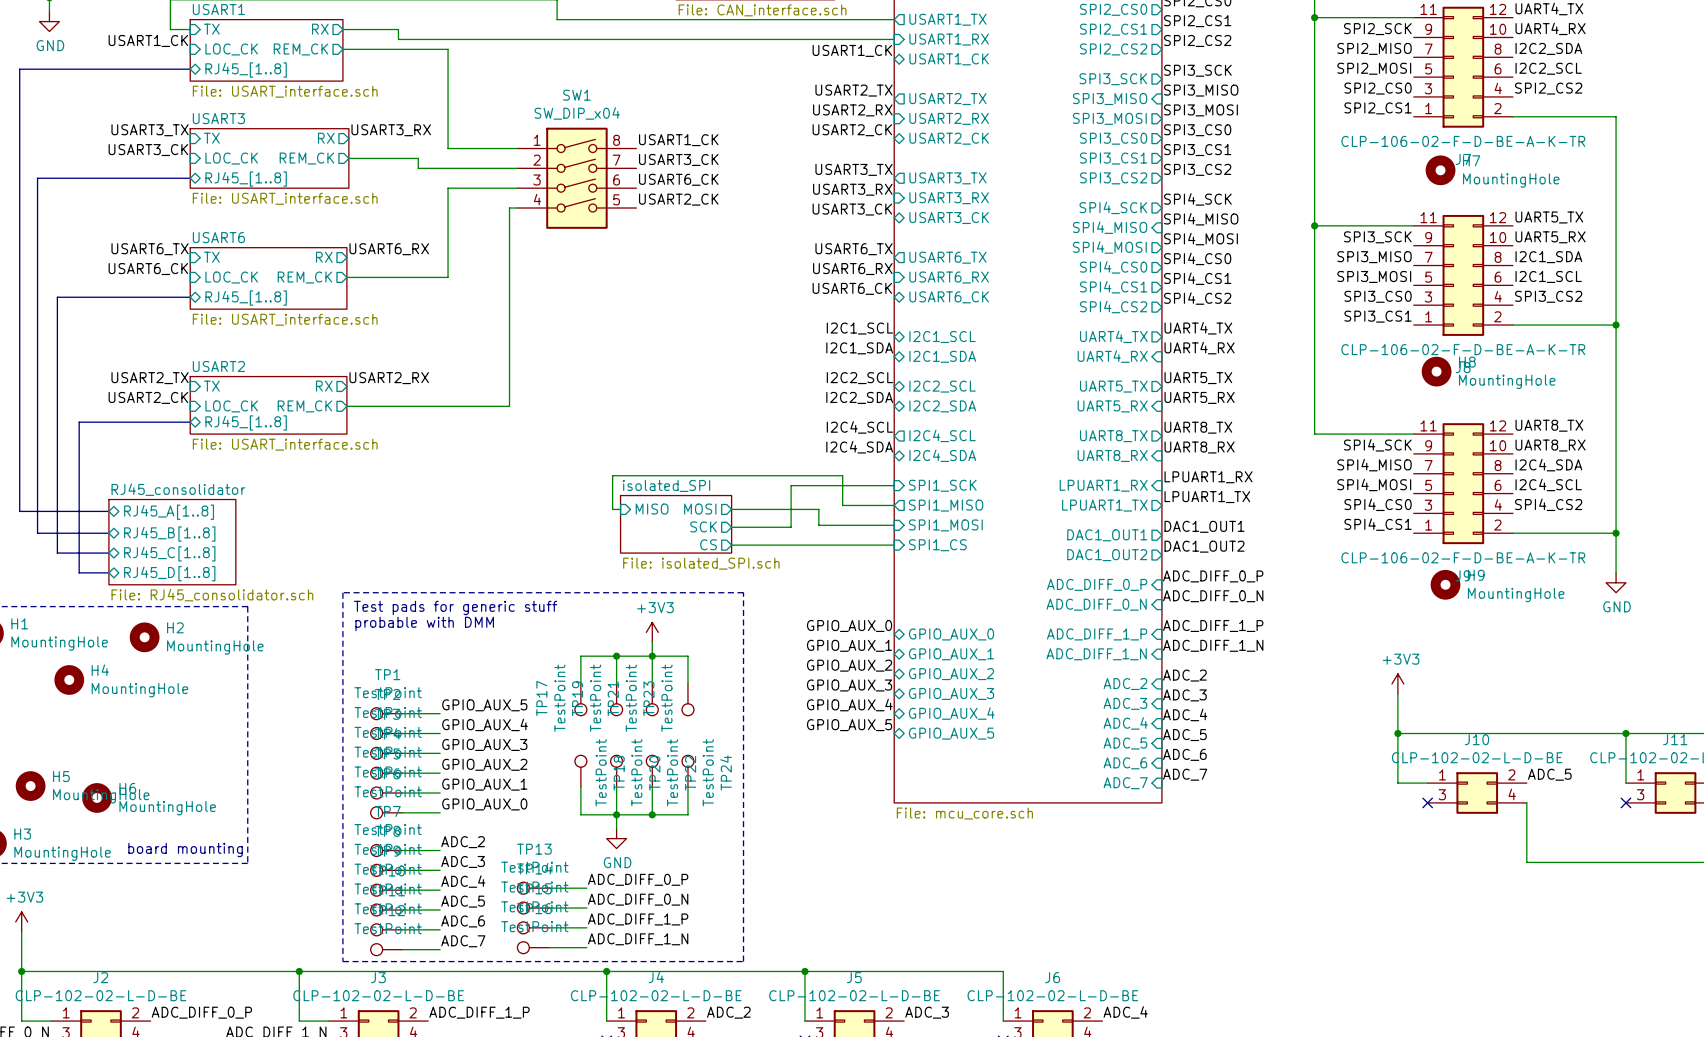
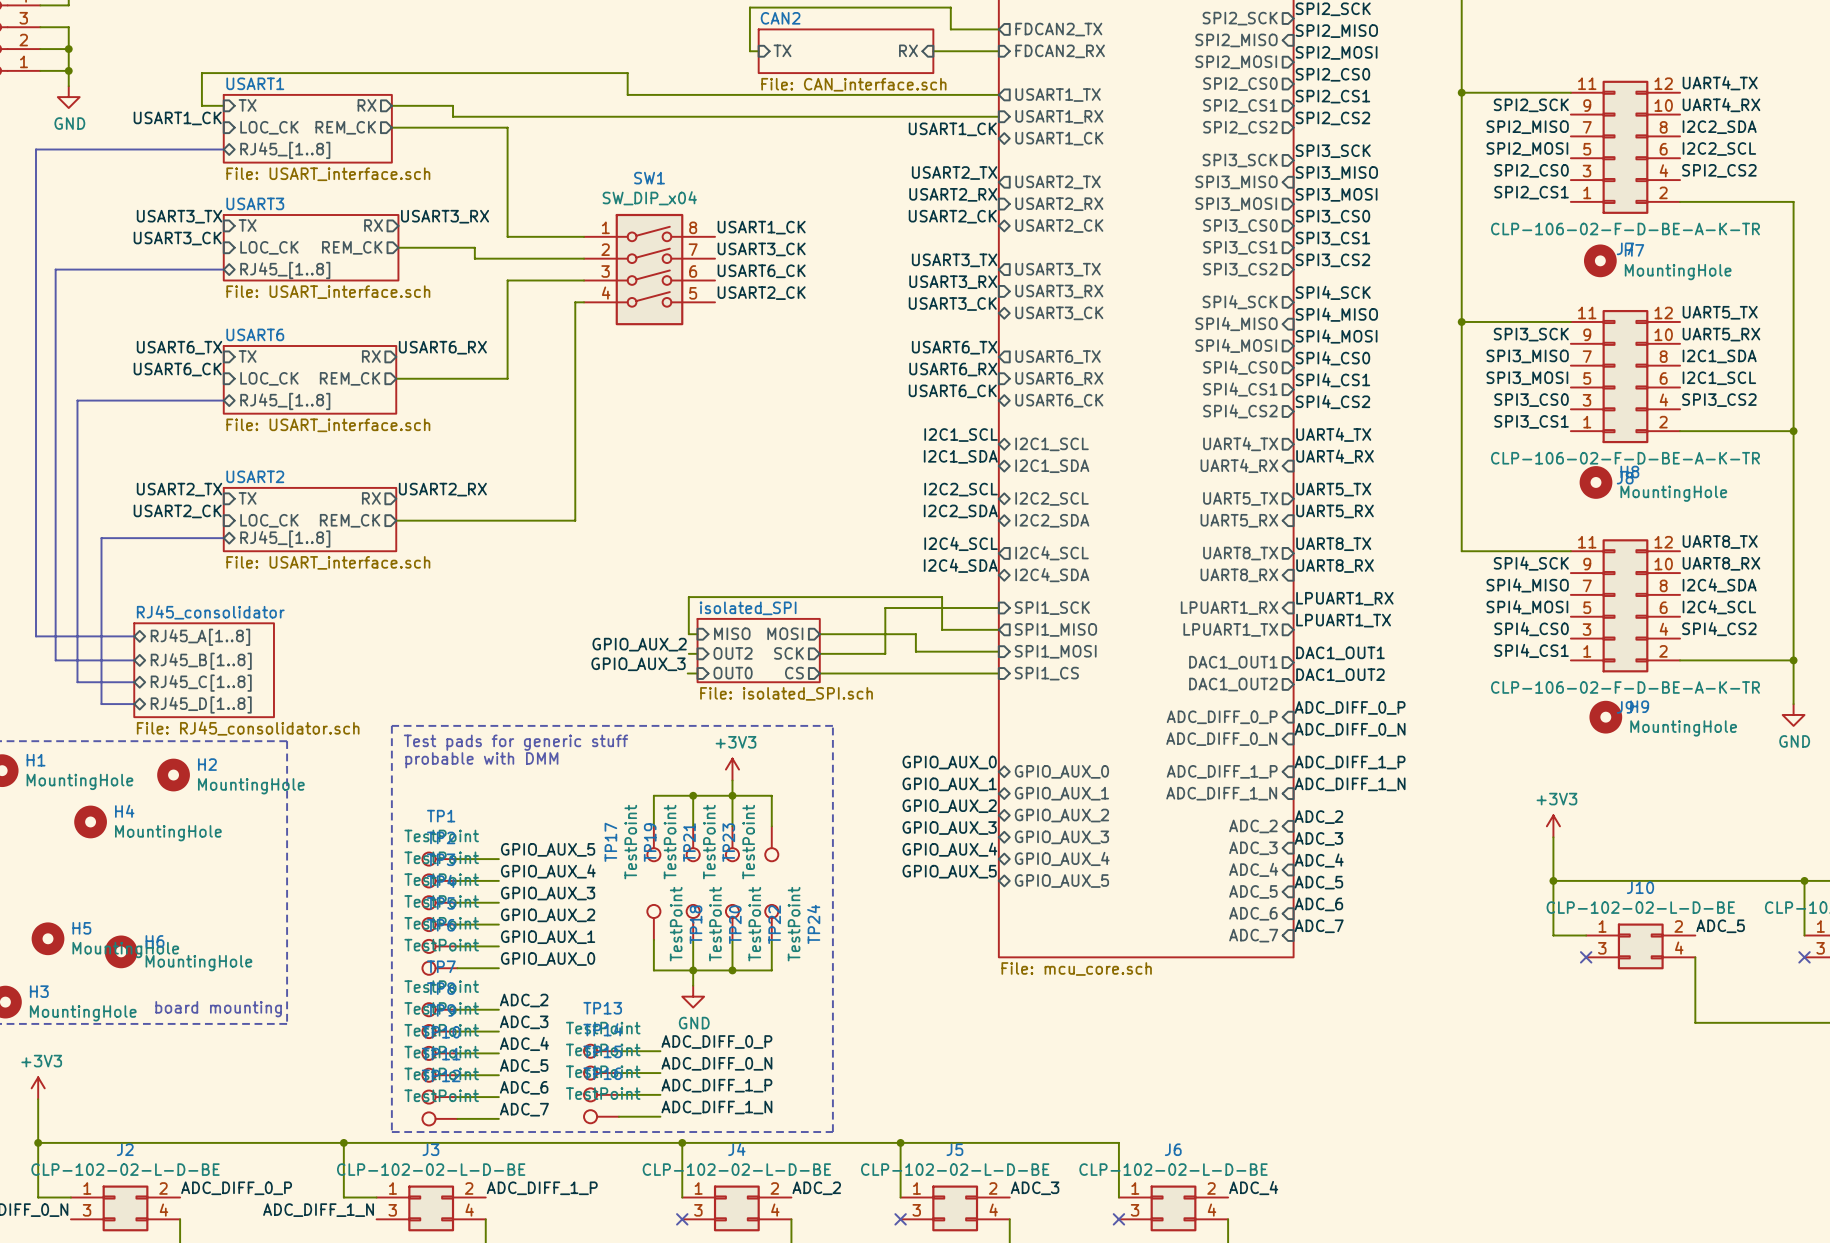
label: none -> GPIO_AUX_2 (639, 644)
sheet pin: none -> OUT2 (733, 653)
wire: none -> (688, 653) (697, 653)
label: none -> GPIO_AUX_3 (638, 664)
sheet pin: none -> OUT0 (733, 673)
wire: none -> (687, 673) (697, 673)

